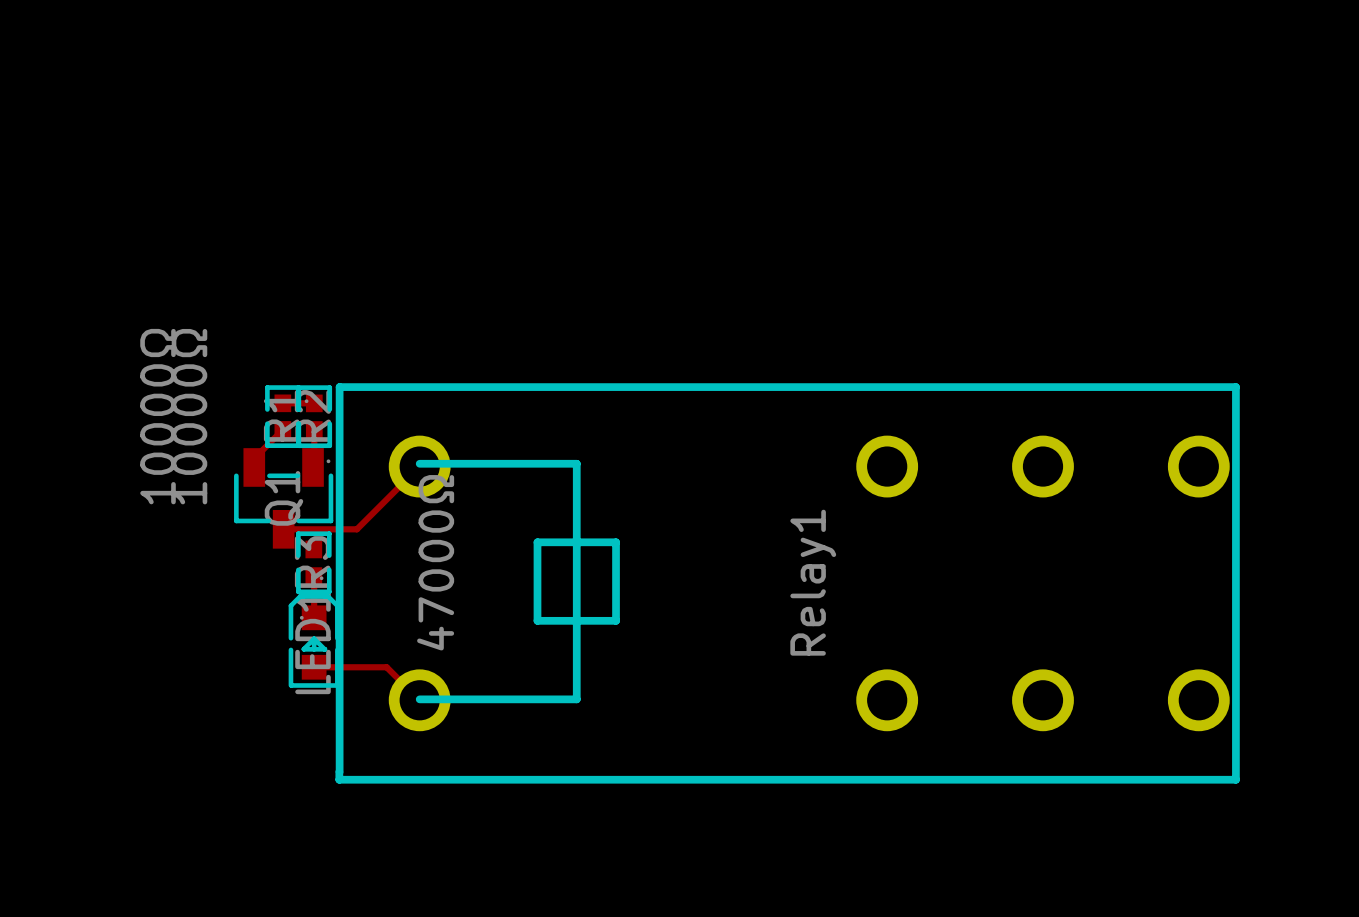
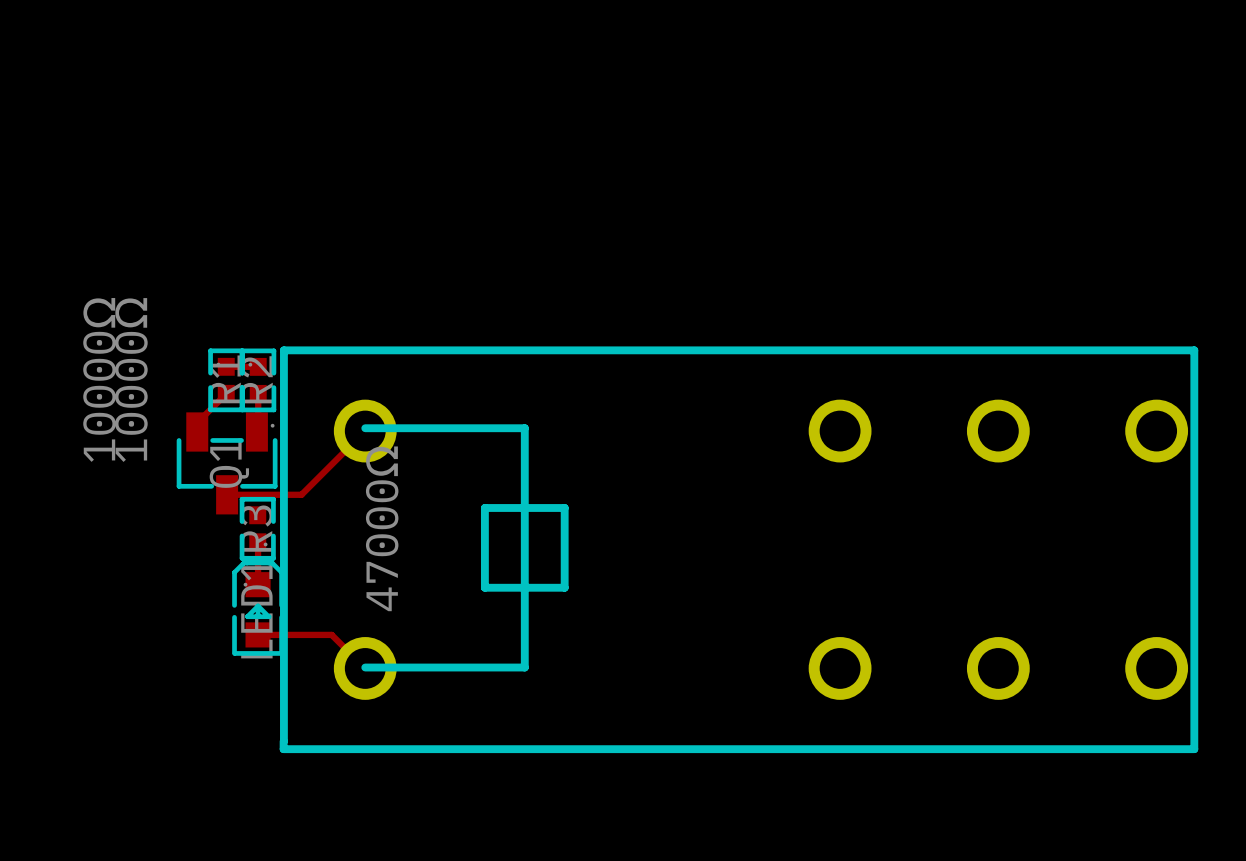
Relay1 name: Relay1 (813, 582) -> none

